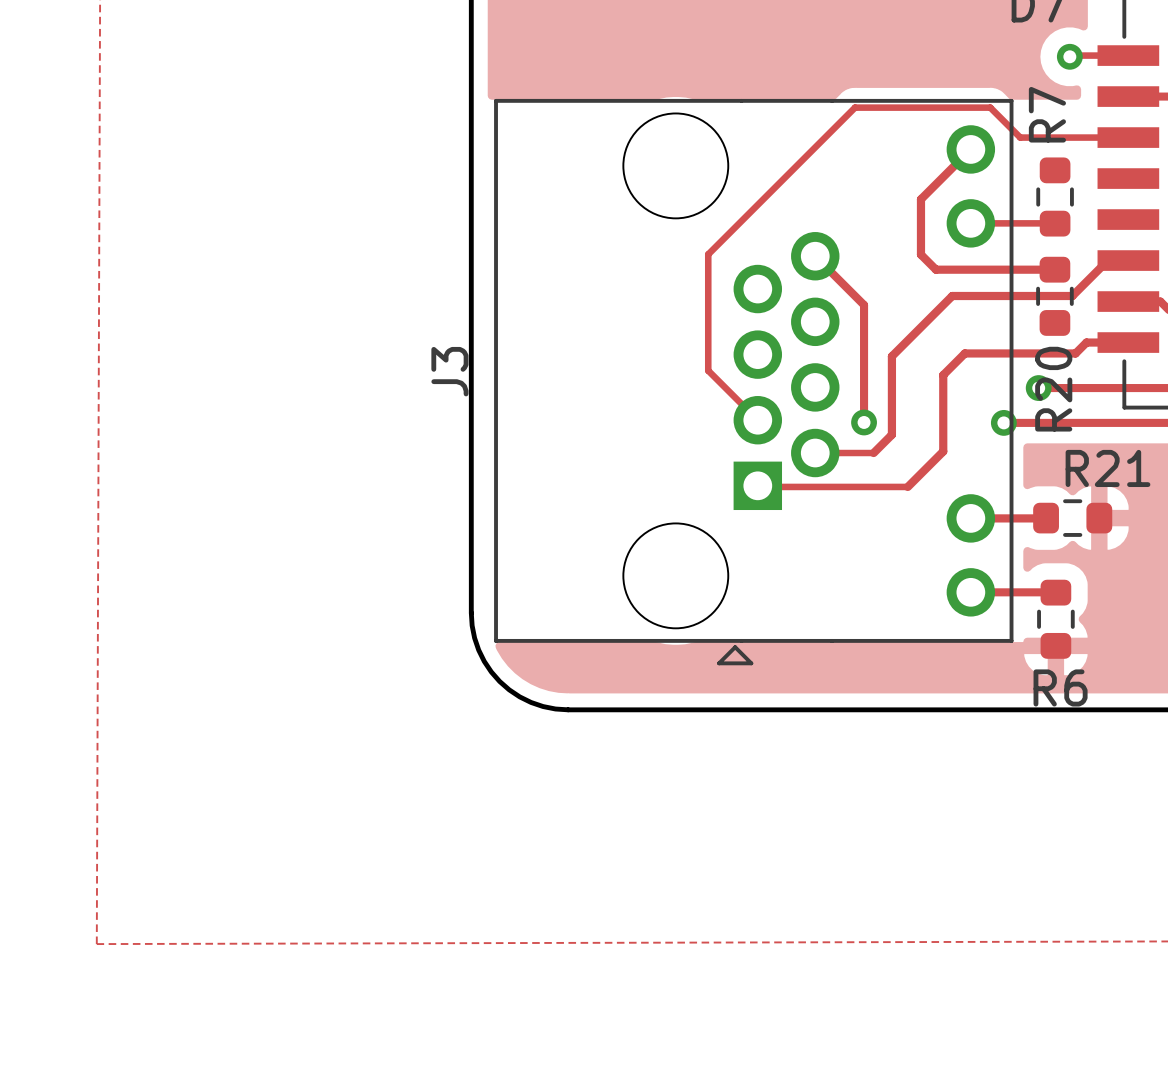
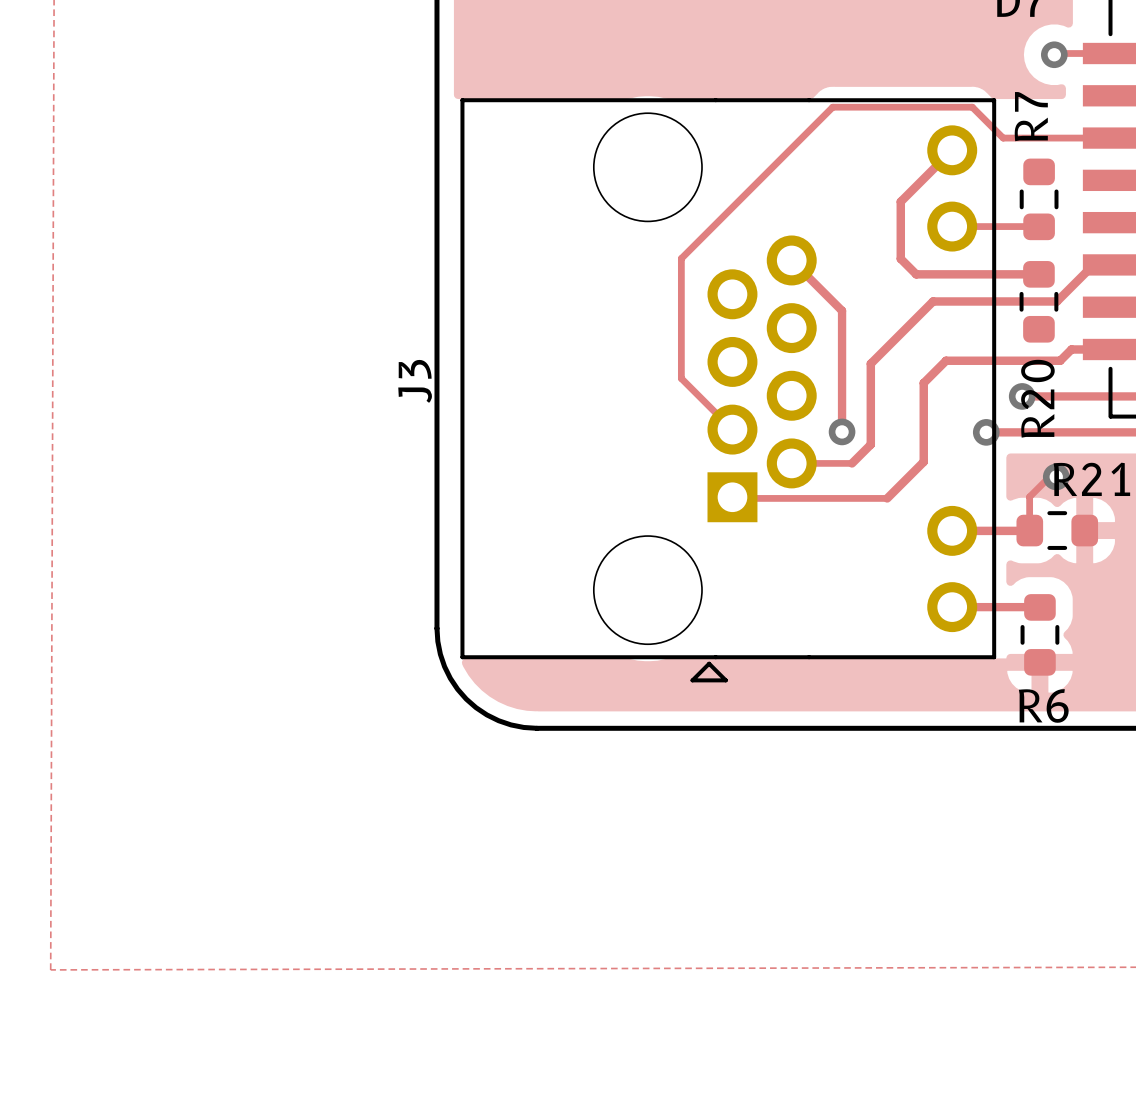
track: none -> (1056, 476) (1049, 476) (1029, 496) (1029, 530)
via: none -> (1056, 476)

